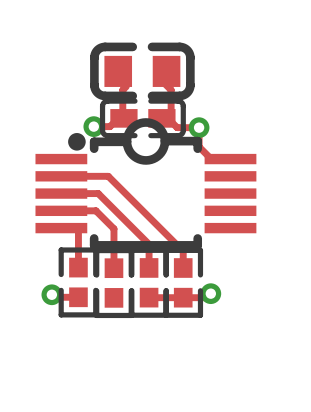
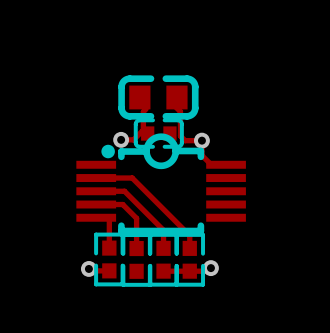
part footprint: [99, 98, 186, 139] -> [133, 118, 184, 149]

